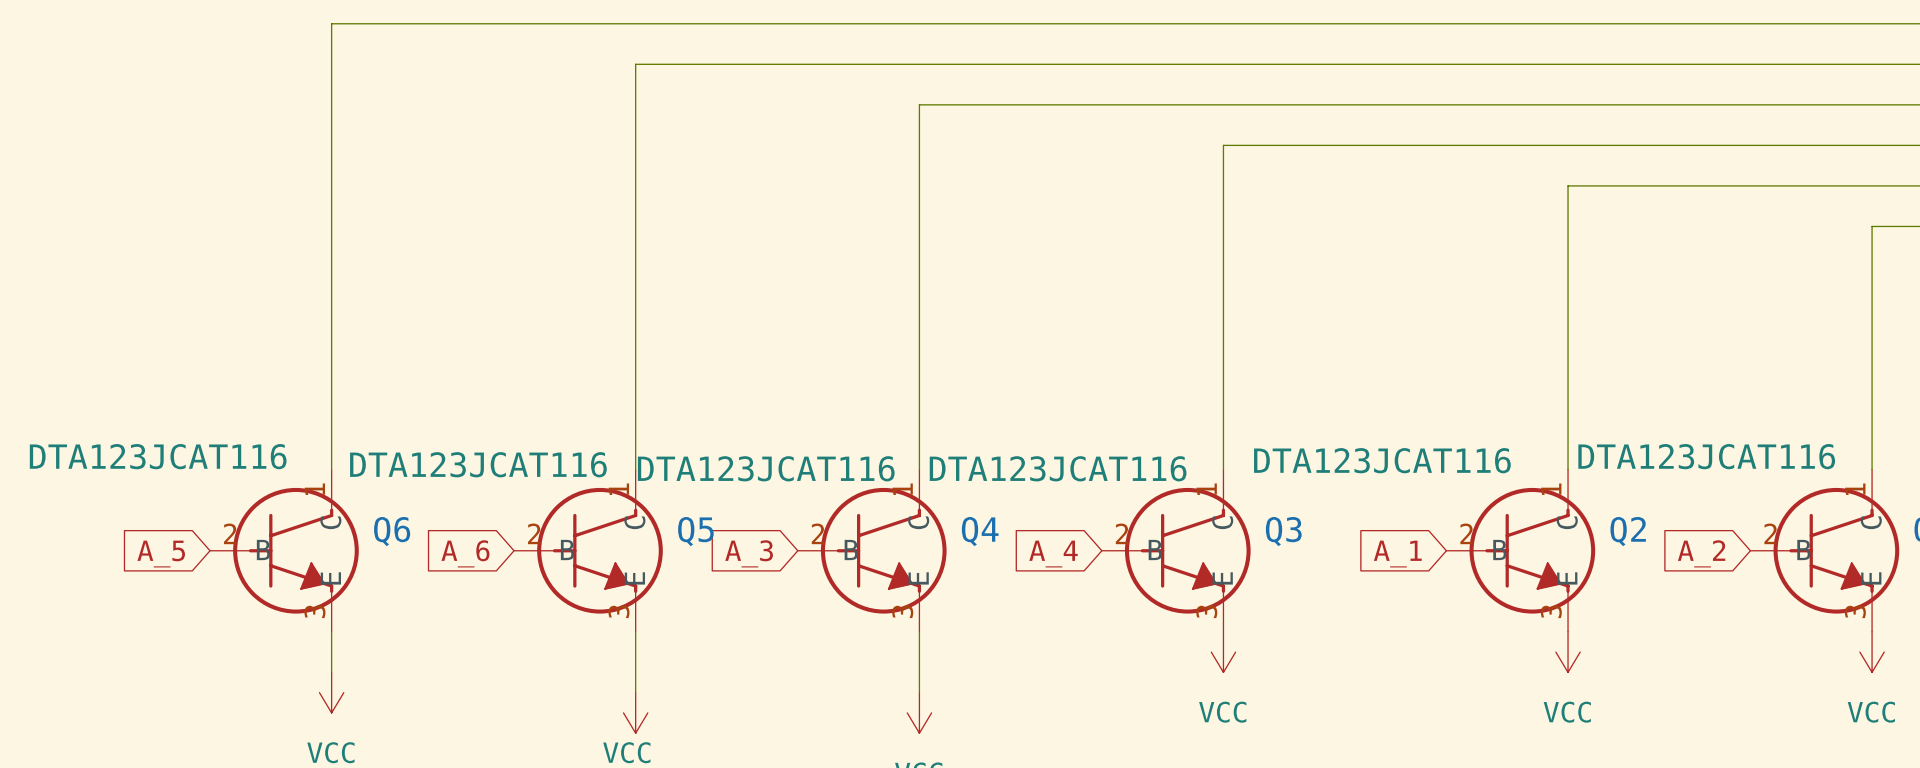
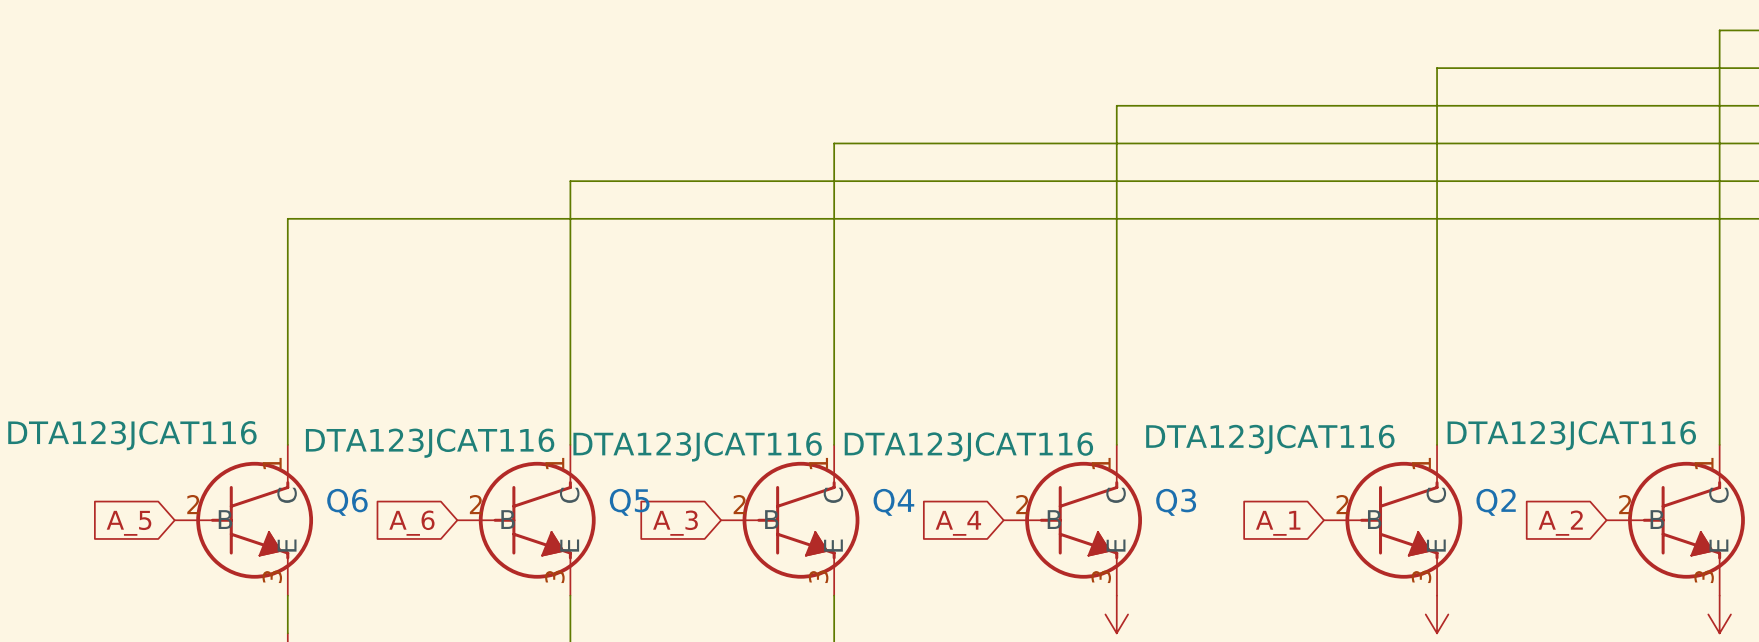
wire: (1872, 23) (331, 23) (331, 226) -> (1719, 30) (1719, 218) (287, 218)
wire: (1568, 64) (635, 64) (635, 185) -> (1437, 68) (1437, 181) (570, 181)
wire: (1223, 104) (919, 104) (919, 145) -> (1116, 105) (1116, 143) (834, 143)

